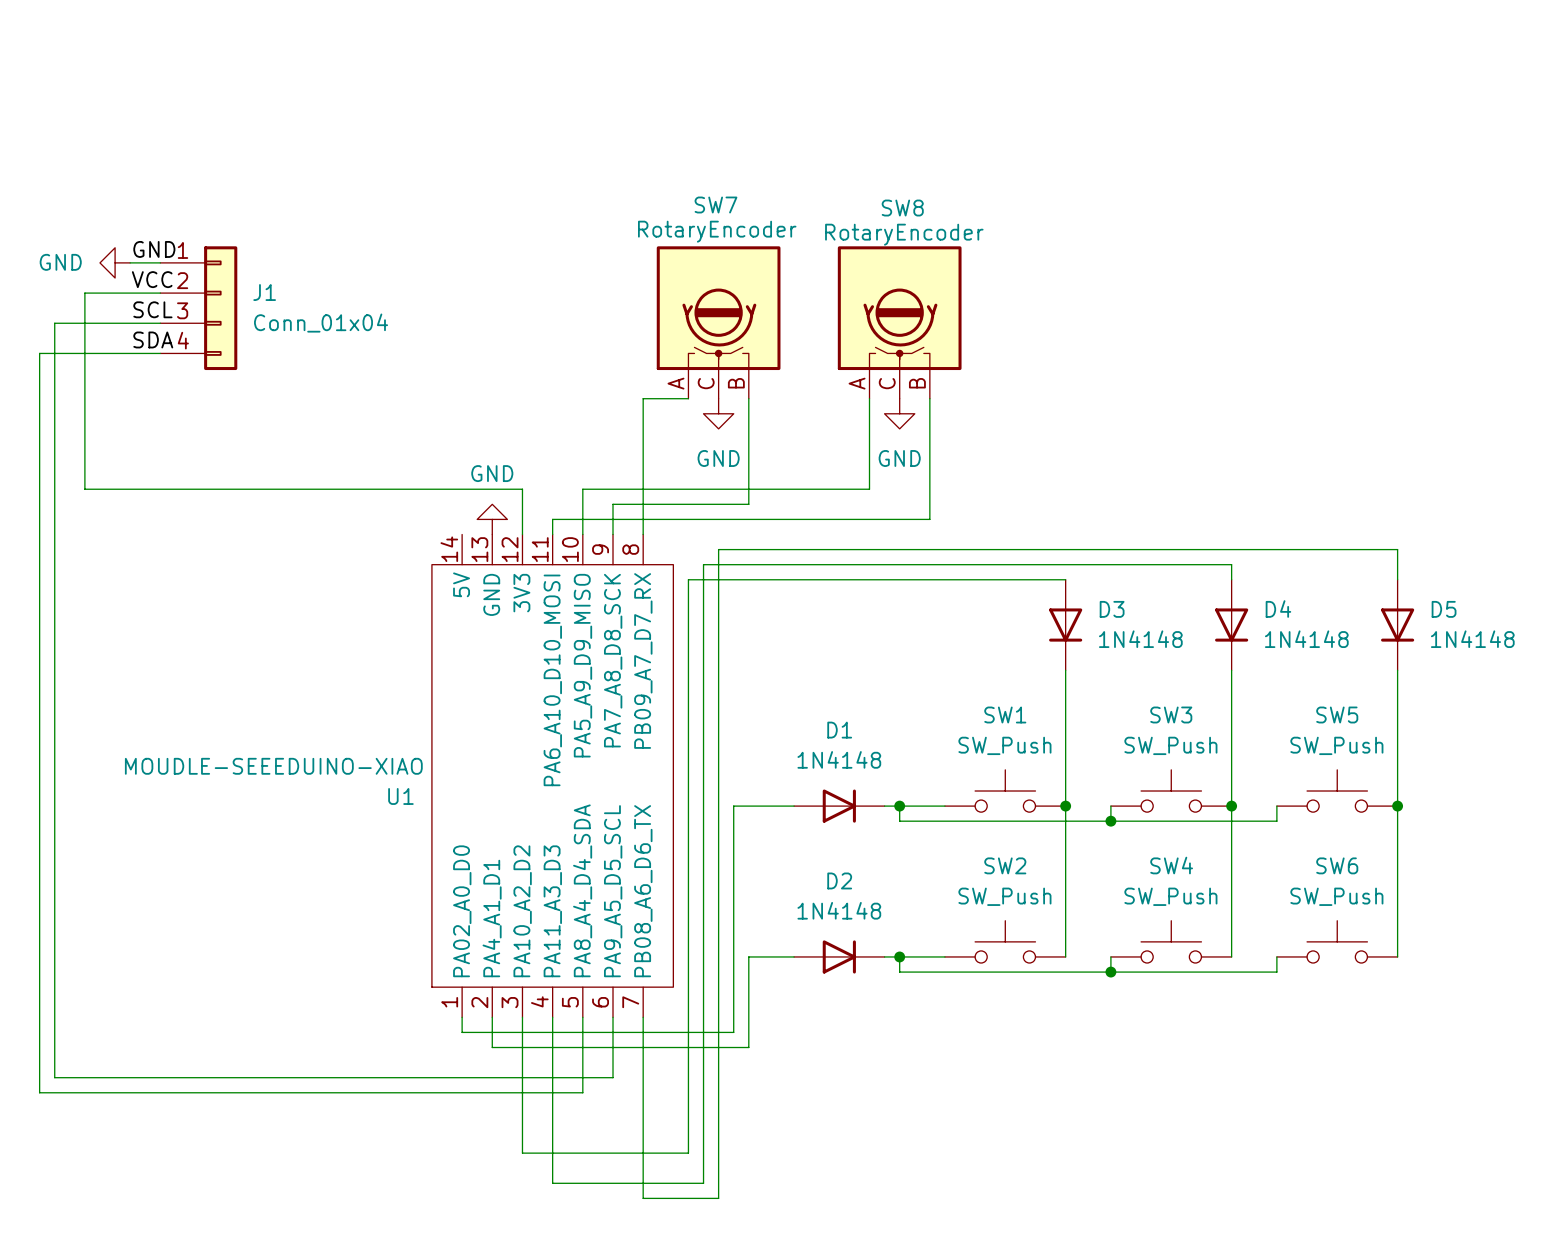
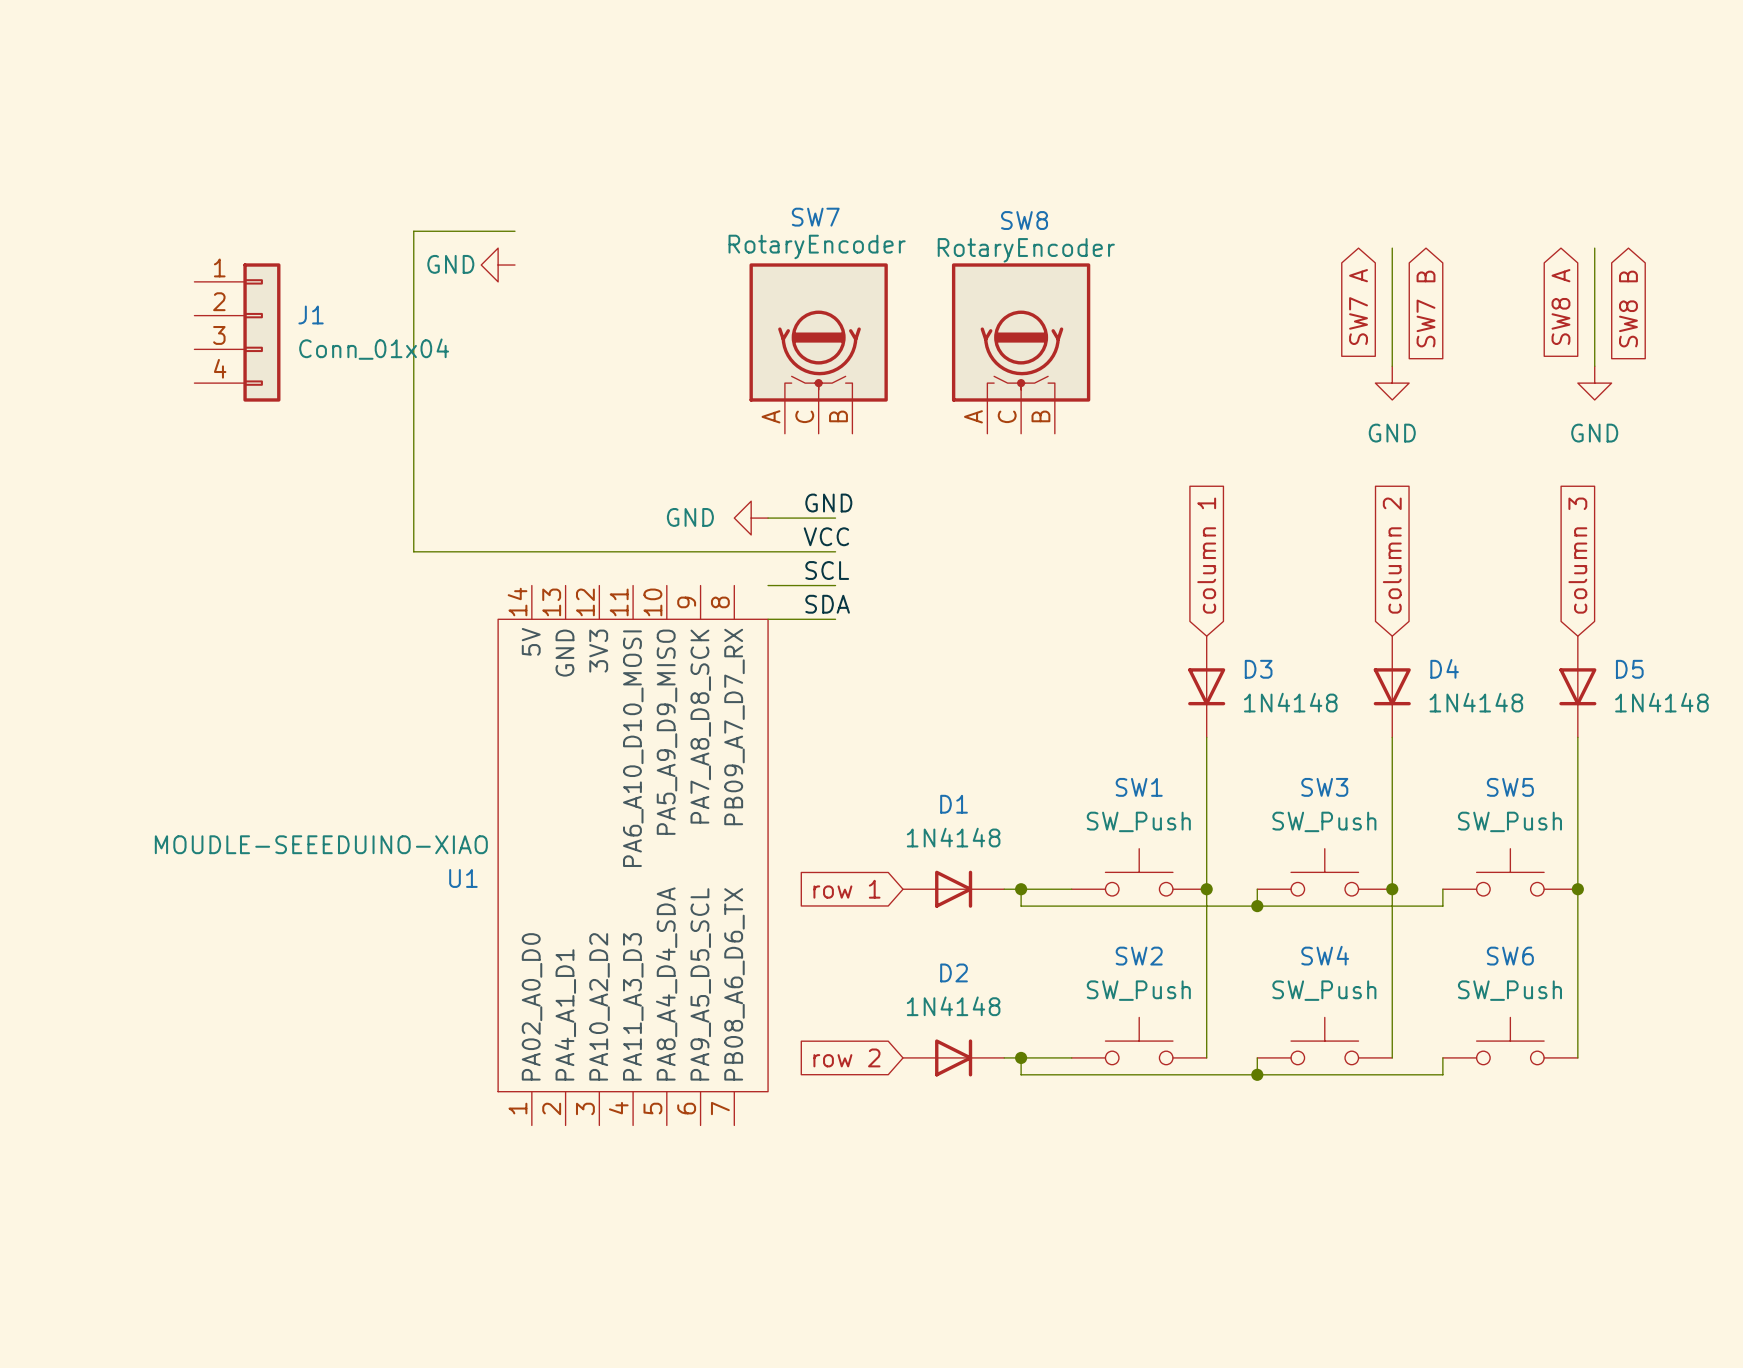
wire: none -> (1392, 248) (1392, 366)
wire: none -> (1594, 248) (1594, 366)
power symbol: none -> GND (498, 265)
label: GND (154, 249) -> none
power symbol: GND (115, 262) -> none
wire: (130, 262) (160, 262) -> none
label: VCC (152, 279) -> none
global label: none -> SW7 A (1358, 307)
global label: none -> SW8 A (1560, 307)
global label: none -> SW7 B (1426, 309)
global label: none -> SW8 B (1628, 309)
wire: (160, 293) (84, 293) (84, 489) (522, 489) (522, 534) -> none
label: SCL (152, 309) -> none
wire: (160, 323) (54, 323) (54, 1077) (613, 1077) (613, 1017) -> none
label: SDA (153, 339) -> none
wire: (160, 353) (39, 353) (39, 1092) (582, 1092) (582, 1017) -> none
power symbol: none -> GND (1392, 383)
power symbol: none -> GND (1594, 383)
wire: (688, 398) (643, 398) (643, 534) -> none
wire: (748, 398) (748, 504) (733, 504) -> none
wire: (869, 398) (869, 489) (582, 489) (582, 534) -> none
wire: (929, 398) (929, 519) (552, 519) (552, 534) -> none
power symbol rotation: 0° (718, 413) -> 90° clockwise (751, 518)
power symbol position: GND (718, 413) -> GND (751, 518)
power symbol: GND (899, 413) -> none
label: none -> GND (828, 503)
wire: none -> (768, 518) (835, 518)
label: none -> VCC (826, 536)
wire: (613, 504) (613, 534) -> (700, 551) (413, 551) (413, 231) (514, 231)
global label: none -> column 1 (1206, 555)
global label: none -> column 2 (1392, 555)
global label: none -> column 3 (1577, 555)
power symbol: GND (492, 519) -> none
label: none -> SCL (827, 570)
wire: none -> (768, 585) (835, 585)
label: none -> SDA (827, 604)
wire: (703, 564) (703, 1183) (552, 1183) (552, 1017) -> (801, 619) (768, 619)
wire: (733, 564) (1231, 564) (1231, 579) -> none
wire: (1065, 579) (688, 579) (688, 1153) (522, 1153) (522, 1017) -> none
wire: (1397, 579) (1397, 549) (718, 549) (718, 1198) (643, 1198) (643, 1017) -> none
global label: none -> row 1 (846, 889)
wire: (794, 806) (733, 806) (733, 1032) (462, 1032) (462, 1017) -> none
global label: none -> row 2 (846, 1057)
wire: (794, 956) (748, 956) (748, 1047) (492, 1047) (492, 1017) -> none

